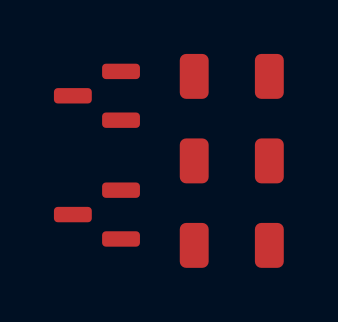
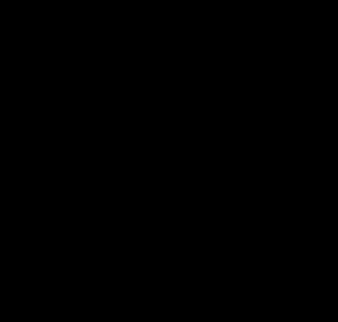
part: (231, 76) -> none
part: (96, 95) -> none
part: (231, 160) -> none
part: (96, 214) -> none
part: (231, 245) -> none

